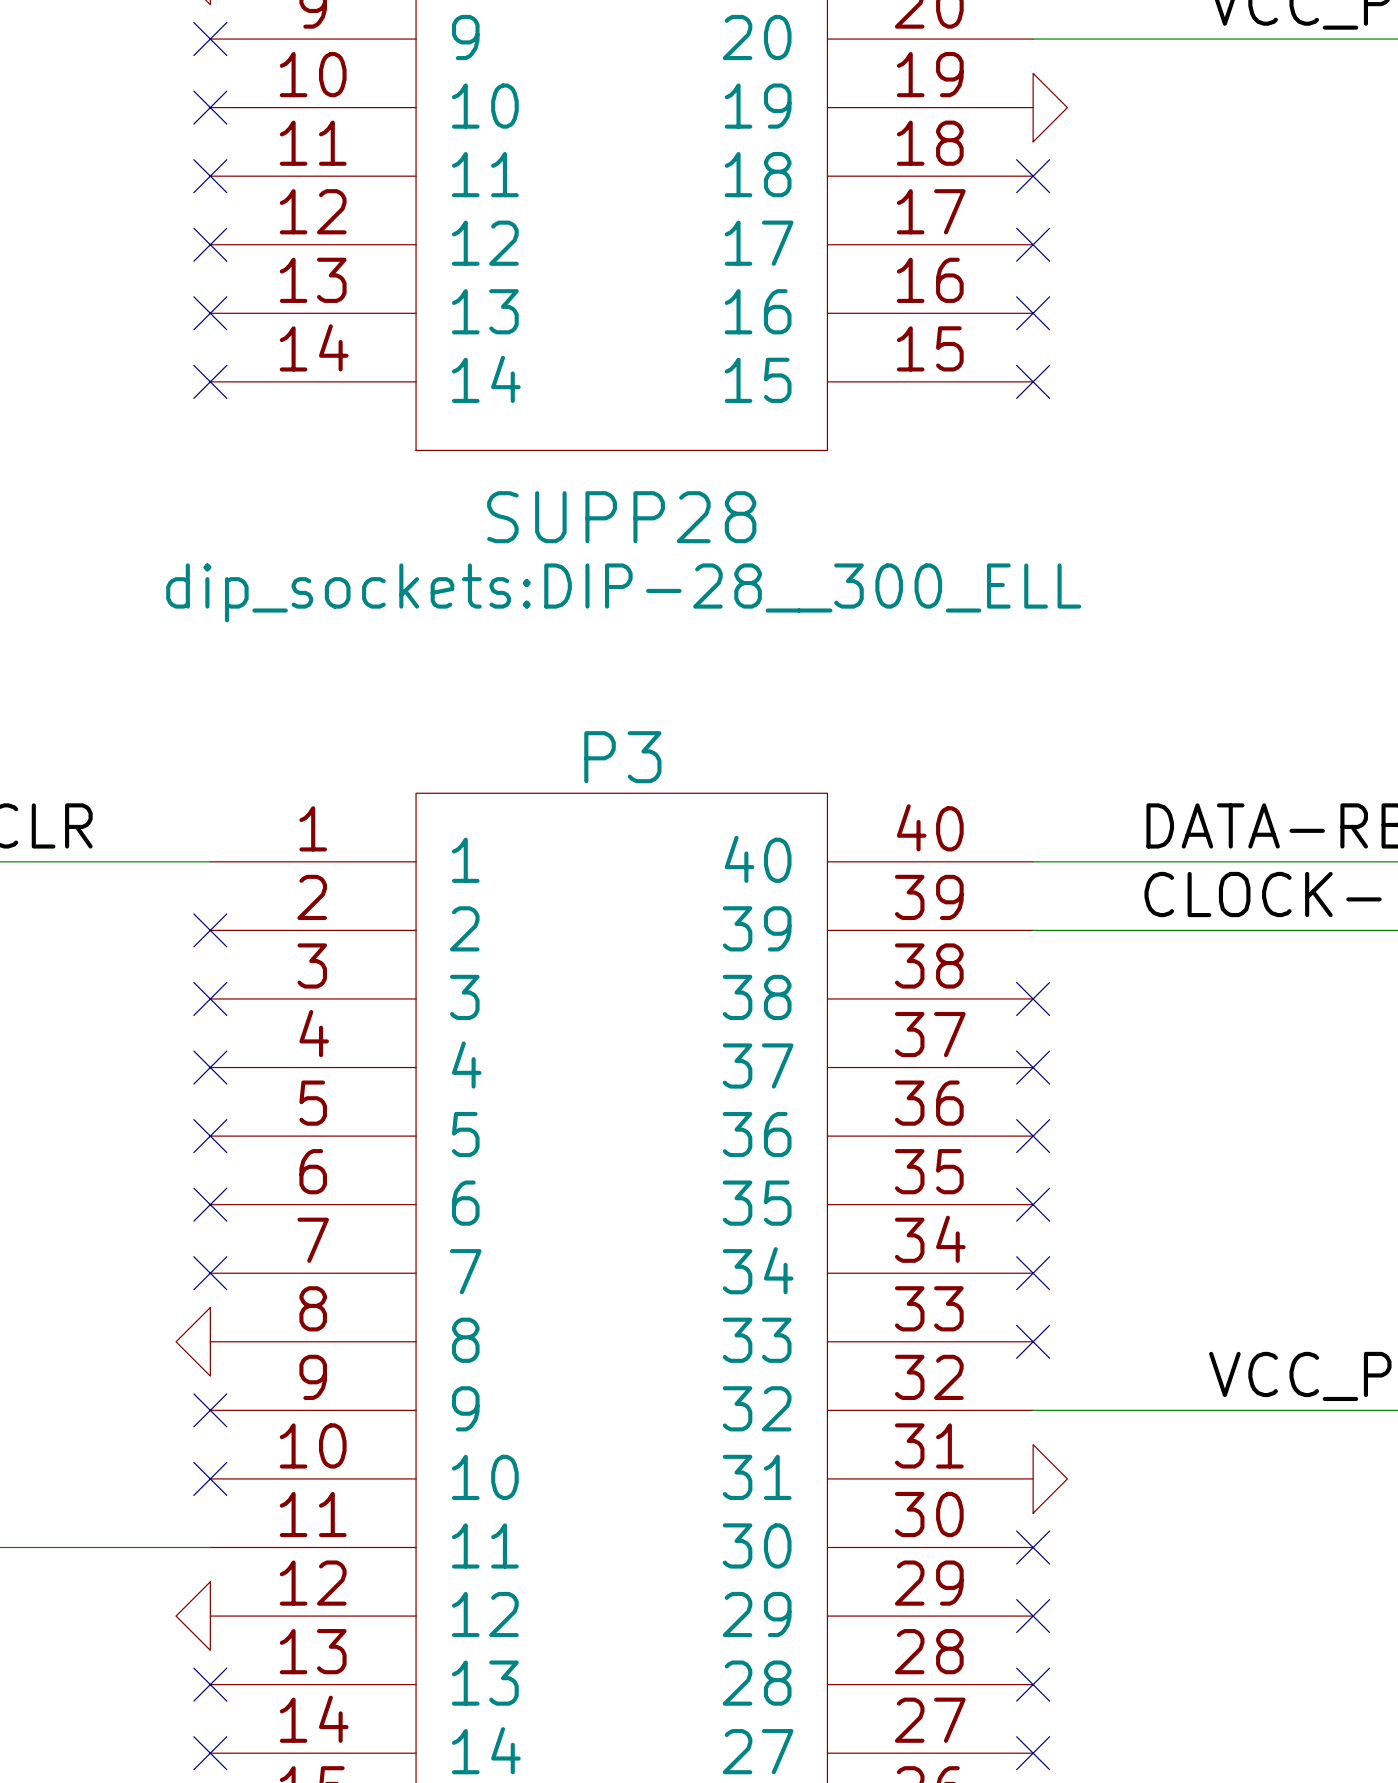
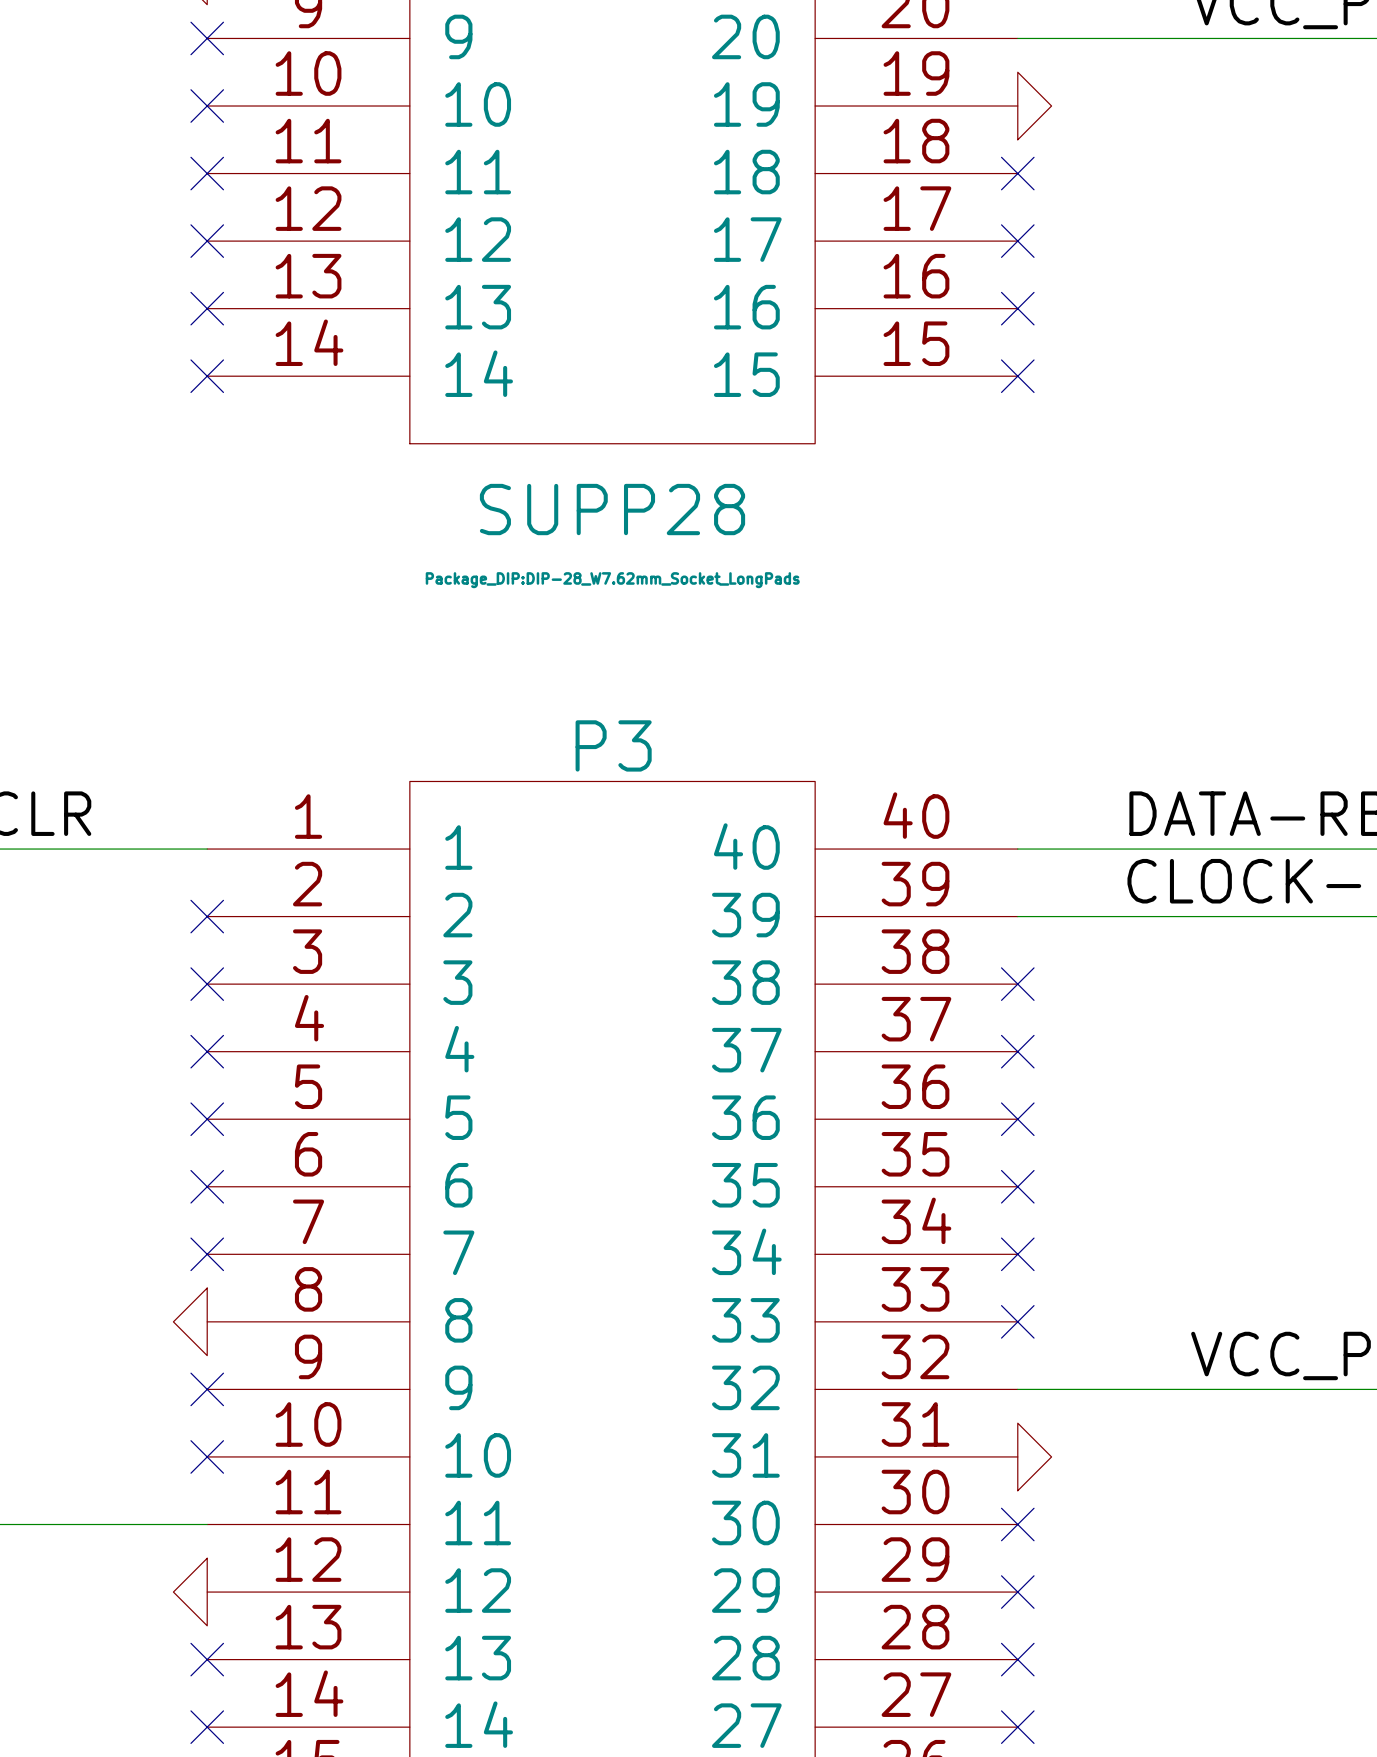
part text: dip_sockets:DIP-28__300_ELL (623, 592) -> Package_DIP:DIP-28_W7.62mm_Socket_LongPads (612, 580)

